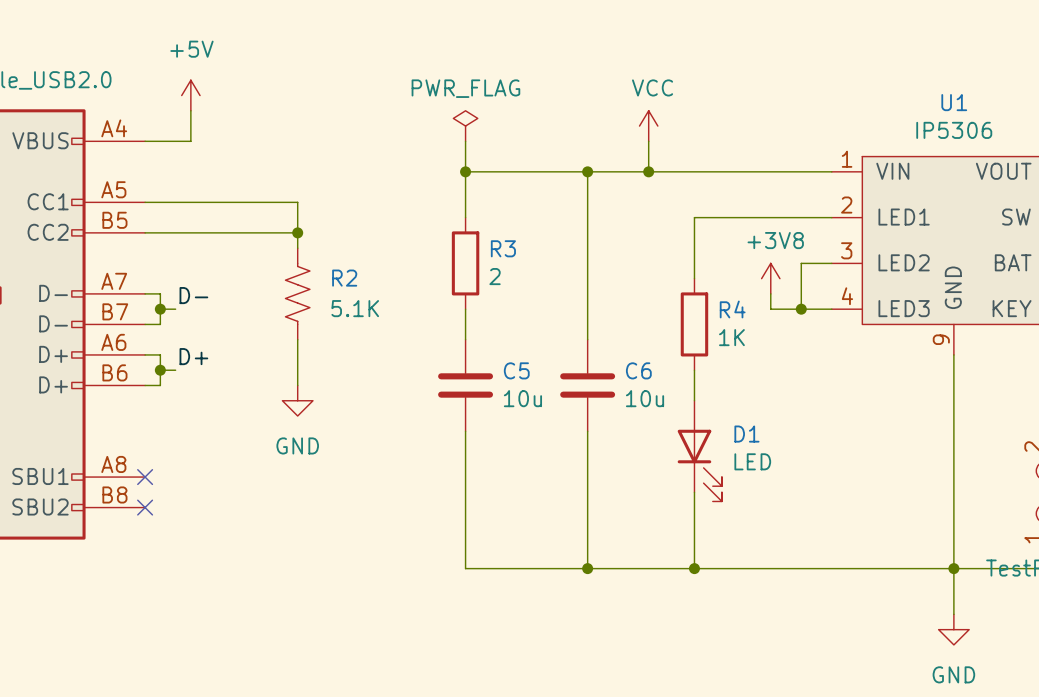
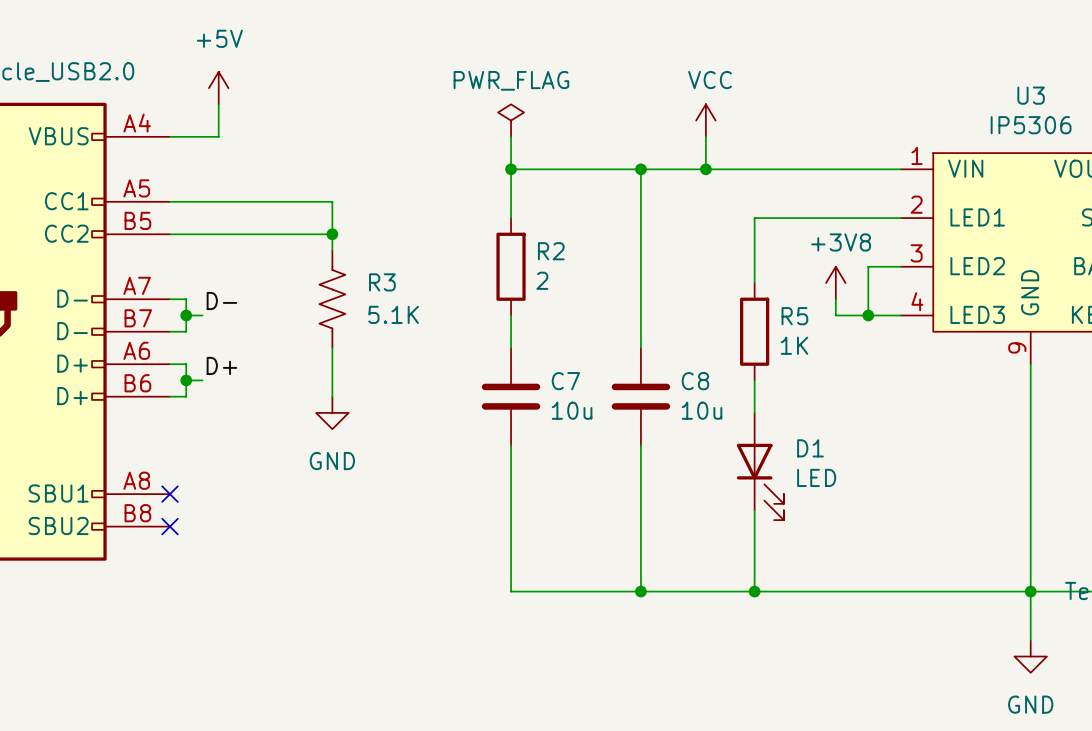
U1 name: U1 (954, 102) -> U3 (1031, 95)
R3 name: R3 (503, 248) -> R2 (551, 251)
R2 name: R2 (344, 278) -> R3 (382, 282)
R4 name: R4 (732, 309) -> R5 (794, 316)
C5 name: C5 (516, 370) -> C7 (565, 381)
C6 name: C6 (638, 370) -> C8 (695, 381)

